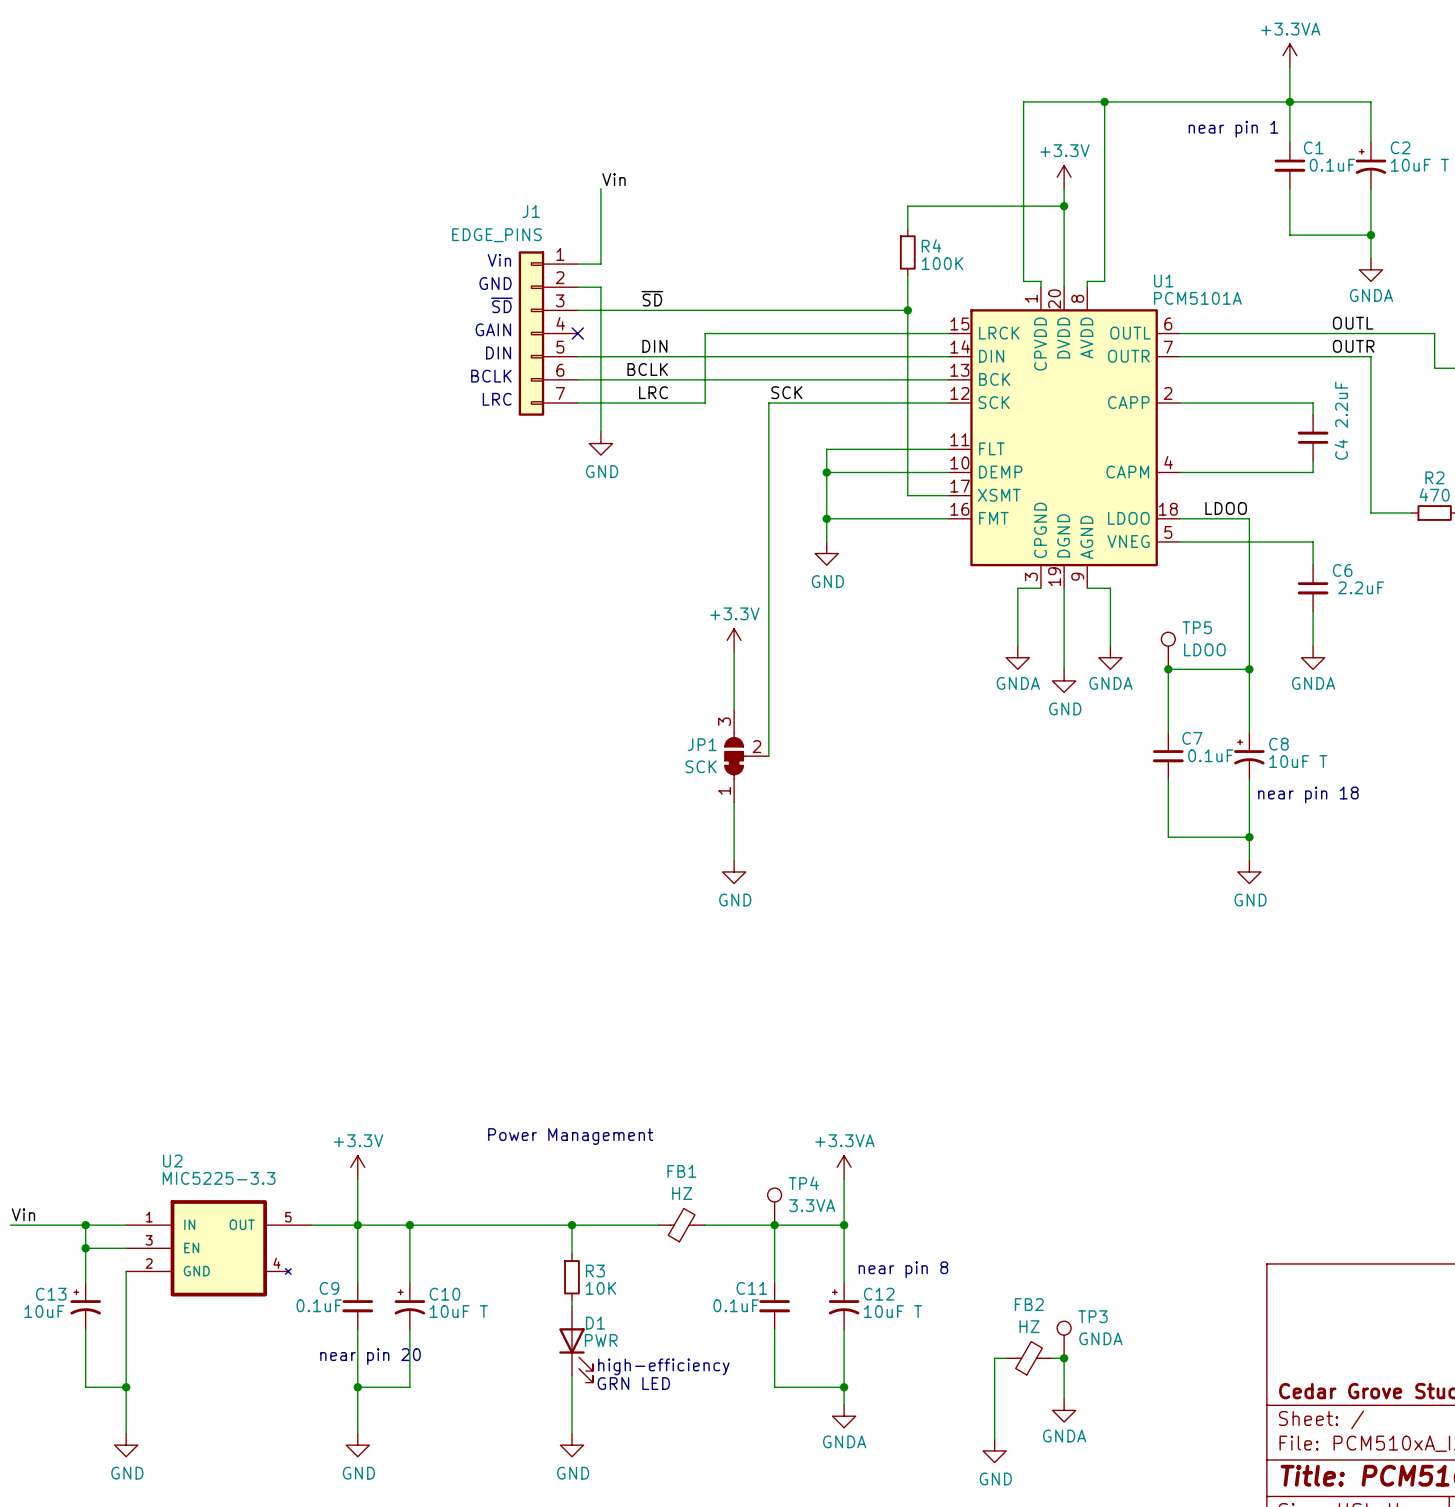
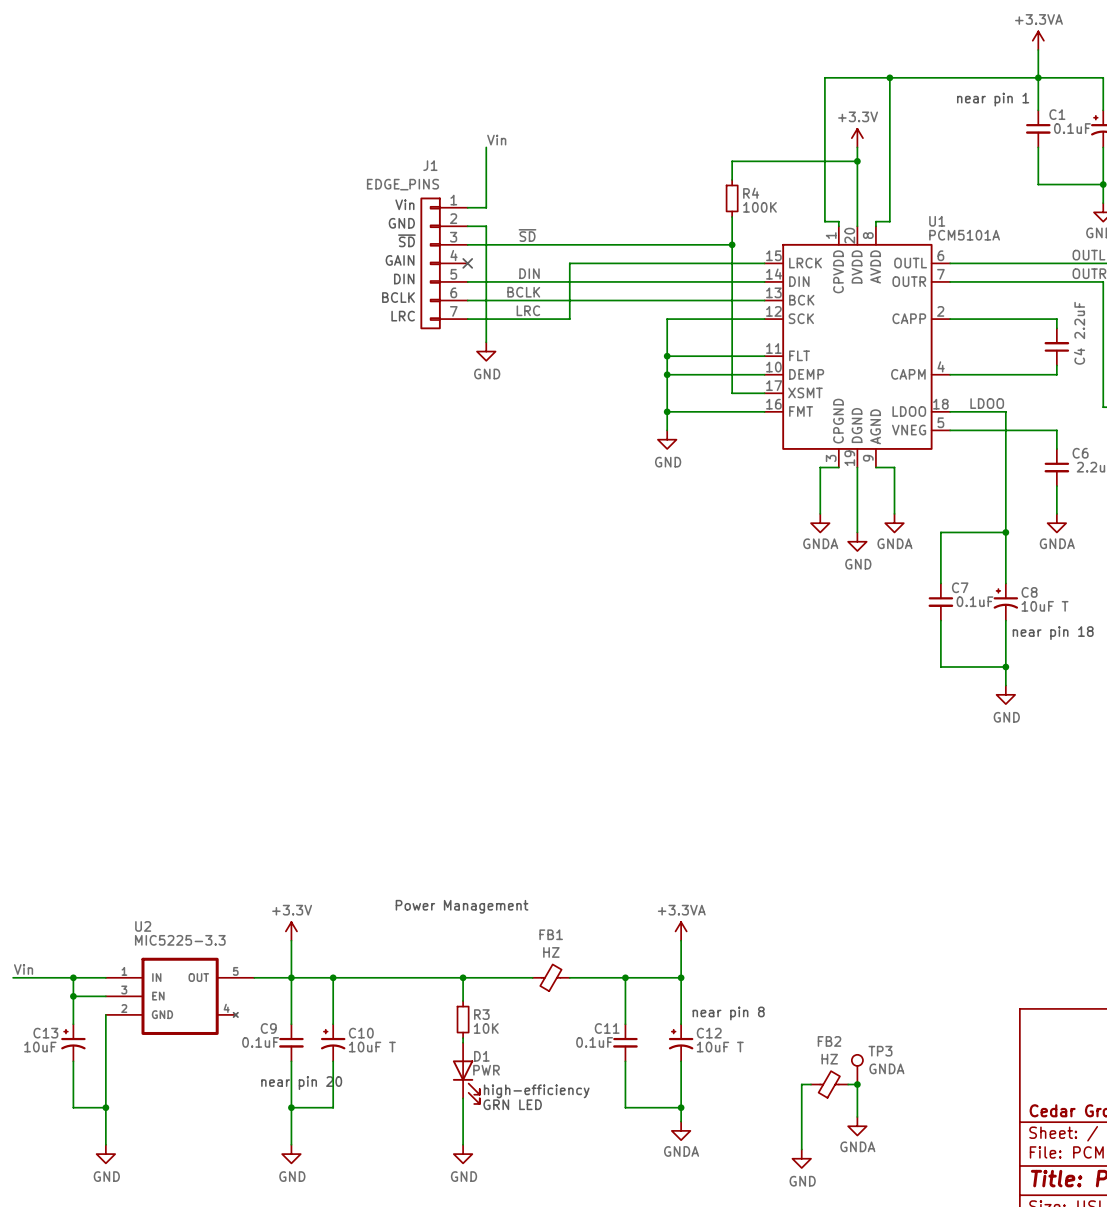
label: SCK (786, 392) -> none
wire: (826, 403) (768, 403) (768, 756) -> (667, 319) (667, 356)
junction: none -> (667, 356)
power symbol: +3.3V (734, 640) -> none
TP5: LDOO (1168, 650) -> none
wire: (734, 651) (734, 709) -> none
junction: (1168, 669) -> none
JP1: SCK (746, 756) -> none
wire: (734, 802) (734, 860) -> none
power symbol: GND (734, 871) -> none
TP4: 3.3VA (774, 1206) -> none

